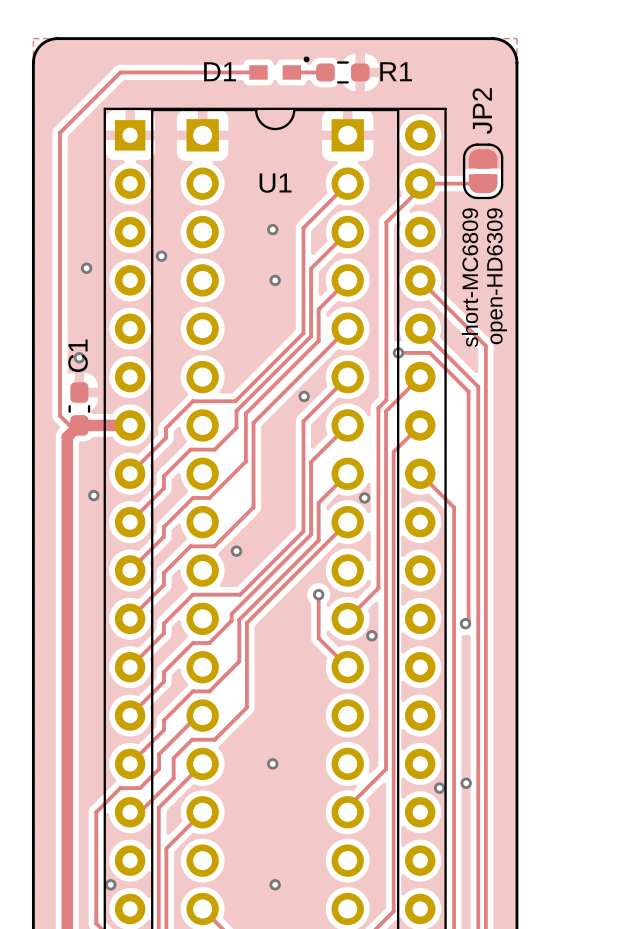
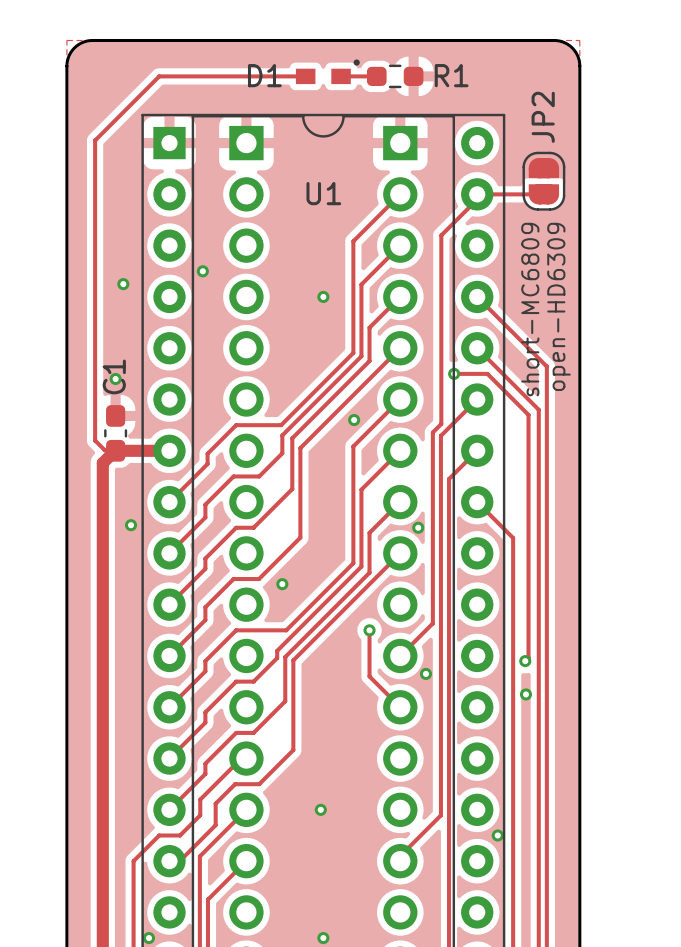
via: (272, 229) -> none
via: none -> (525, 694)
via: (466, 783) -> none

